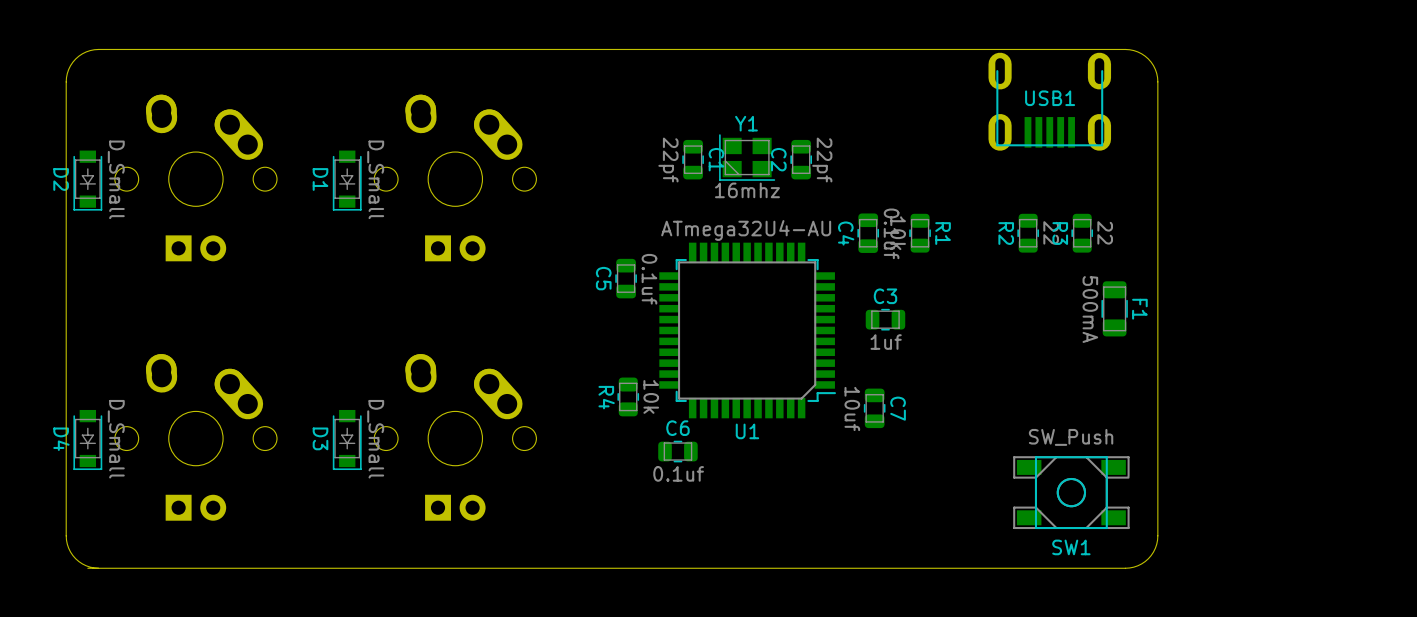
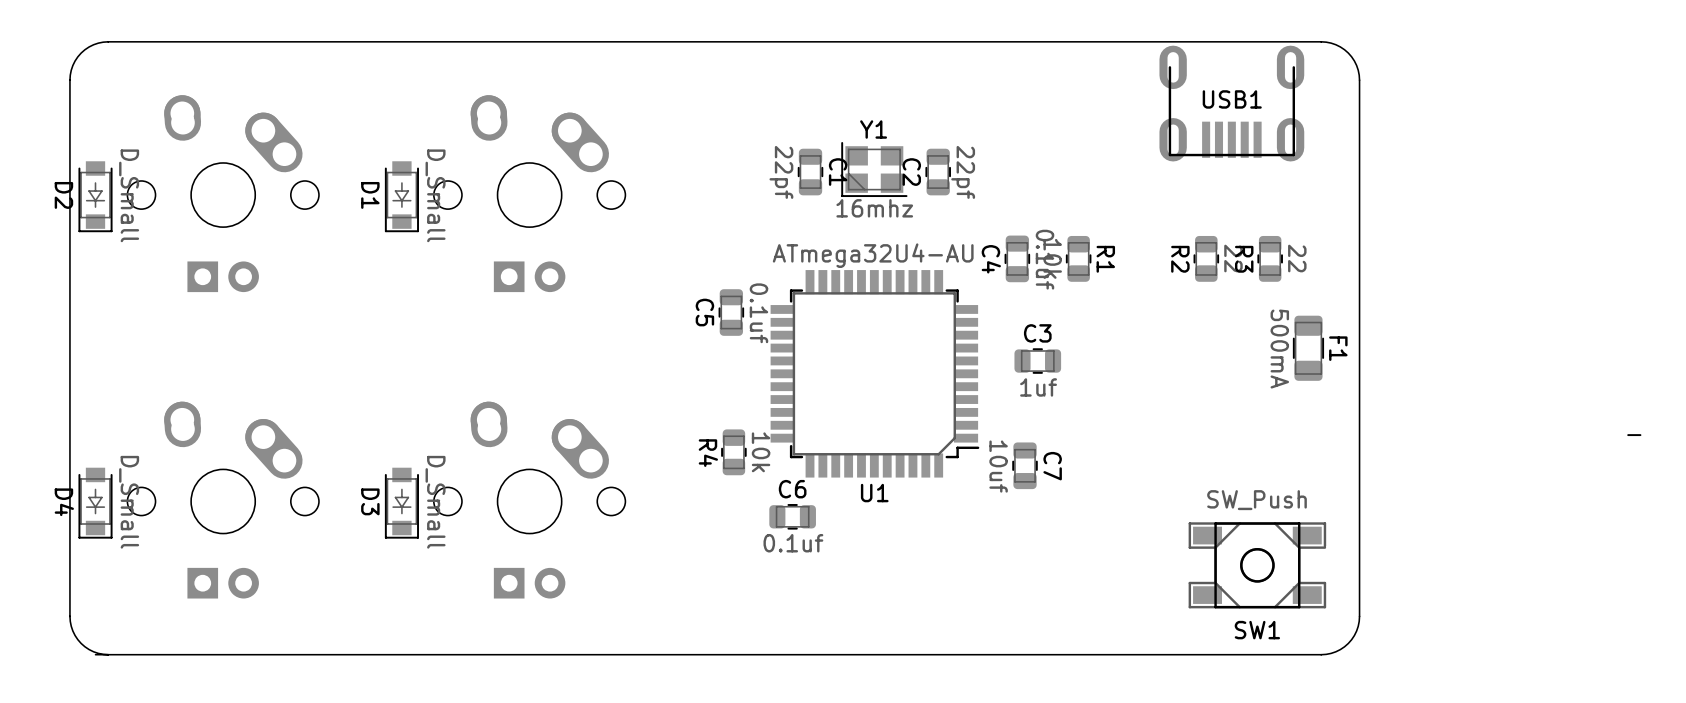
USB1 footprint: [988, 52, 1112, 151] -> [1159, 45, 1642, 437]

